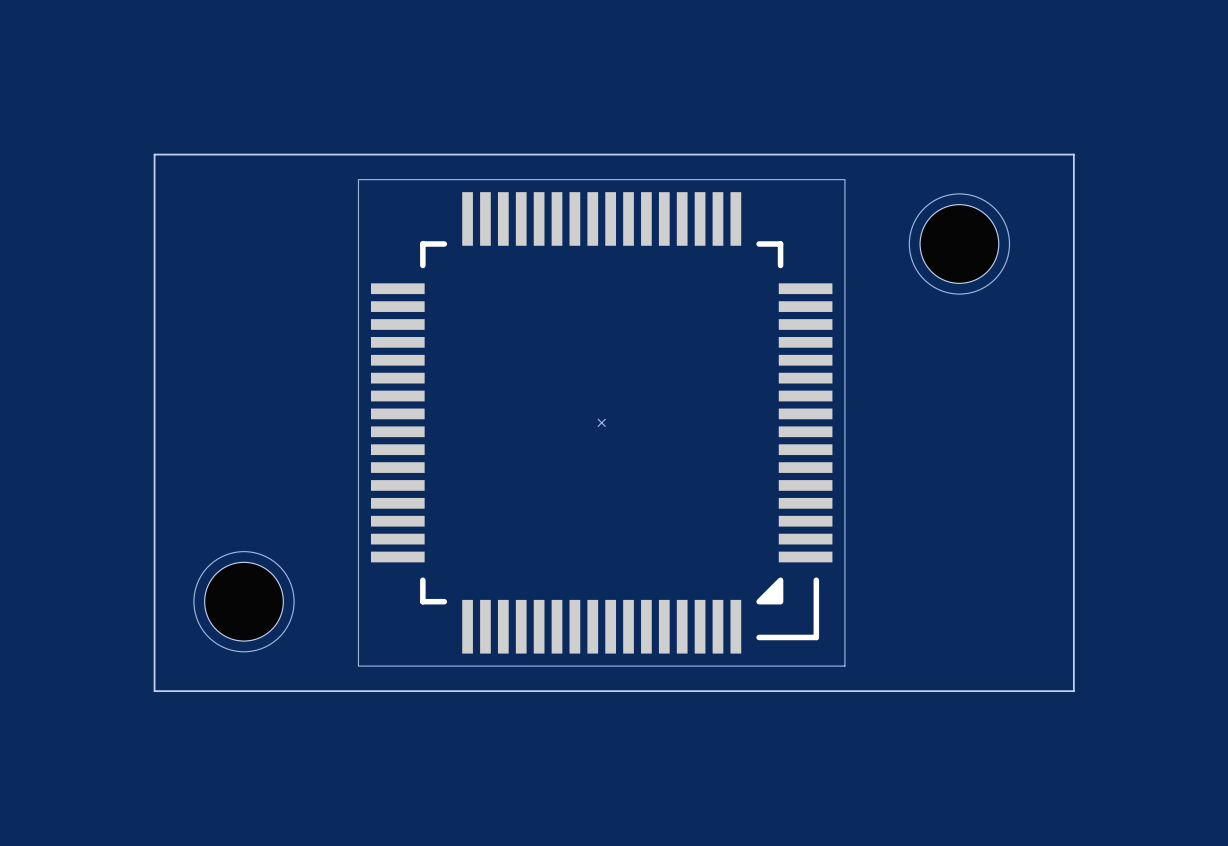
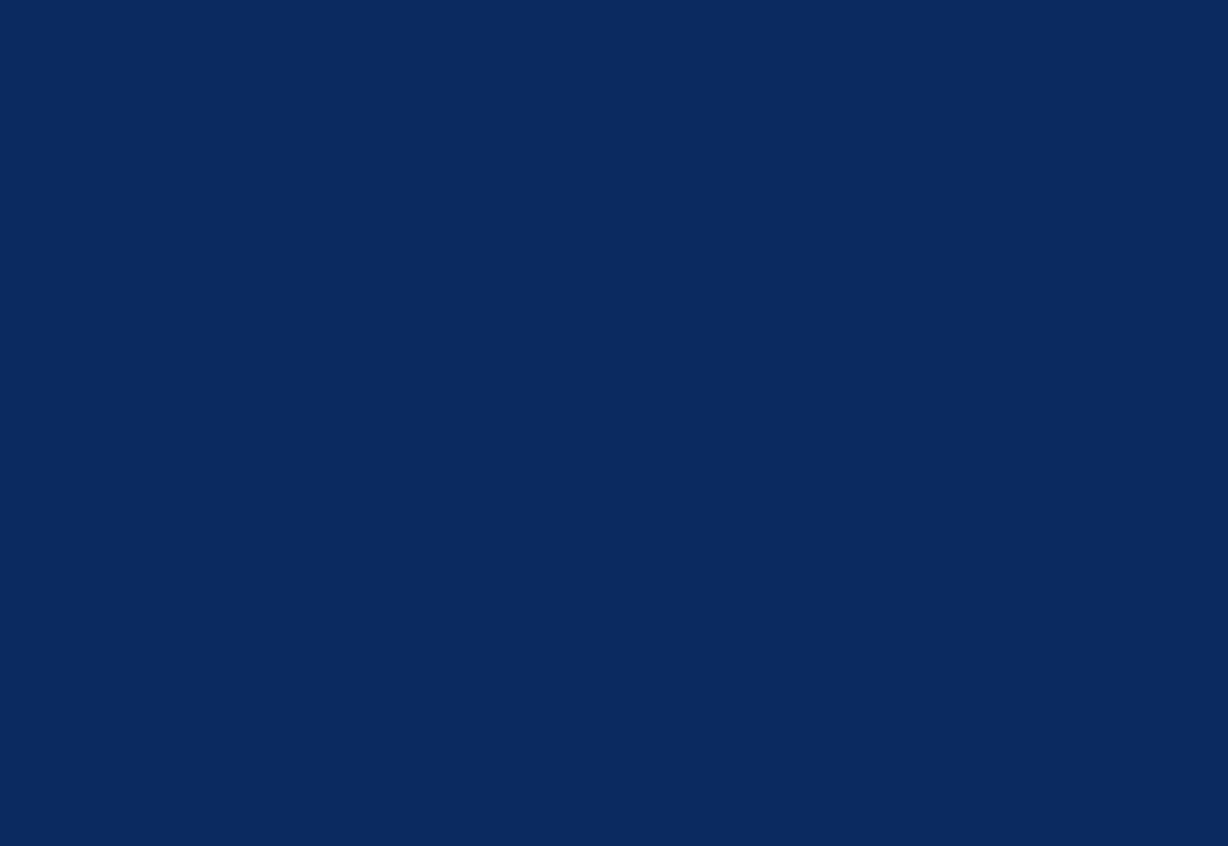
board edge: (154, 154) (1073, 154) (1073, 691) (154, 691) (154, 154) -> none
part: (959, 244) -> none
part: (601, 422) -> none
part: (244, 601) -> none

